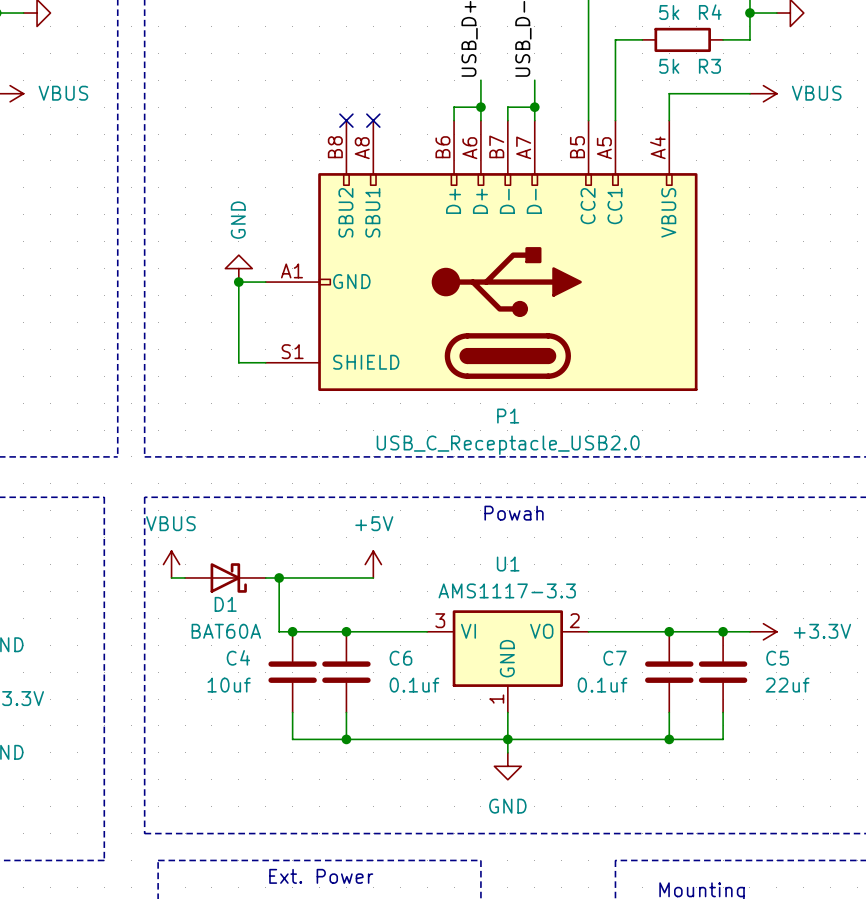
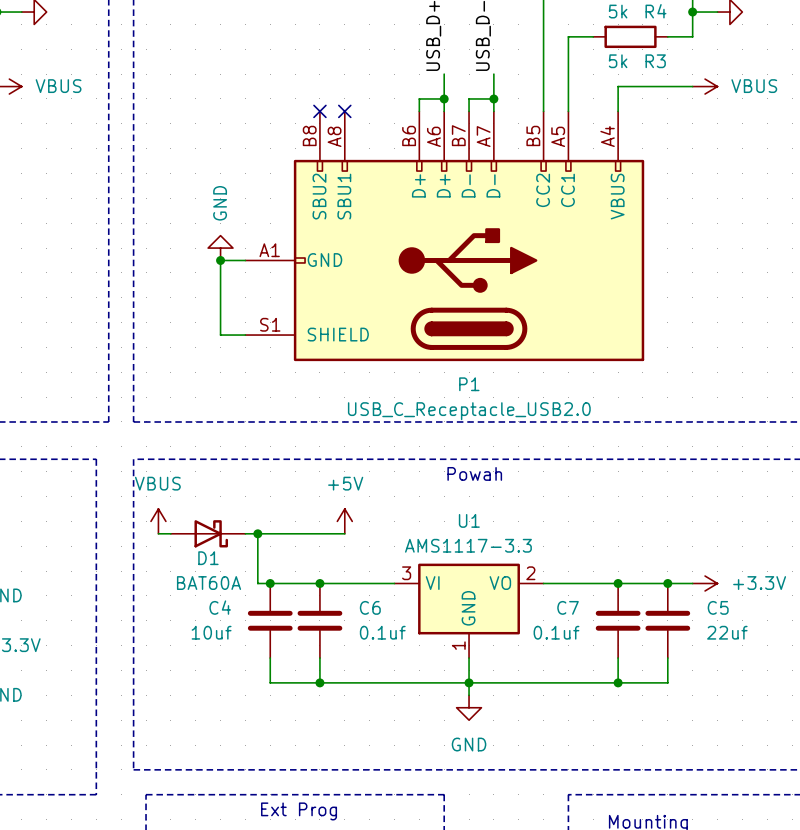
text: Ext. Power (321, 876) -> Ext Prog (299, 811)

